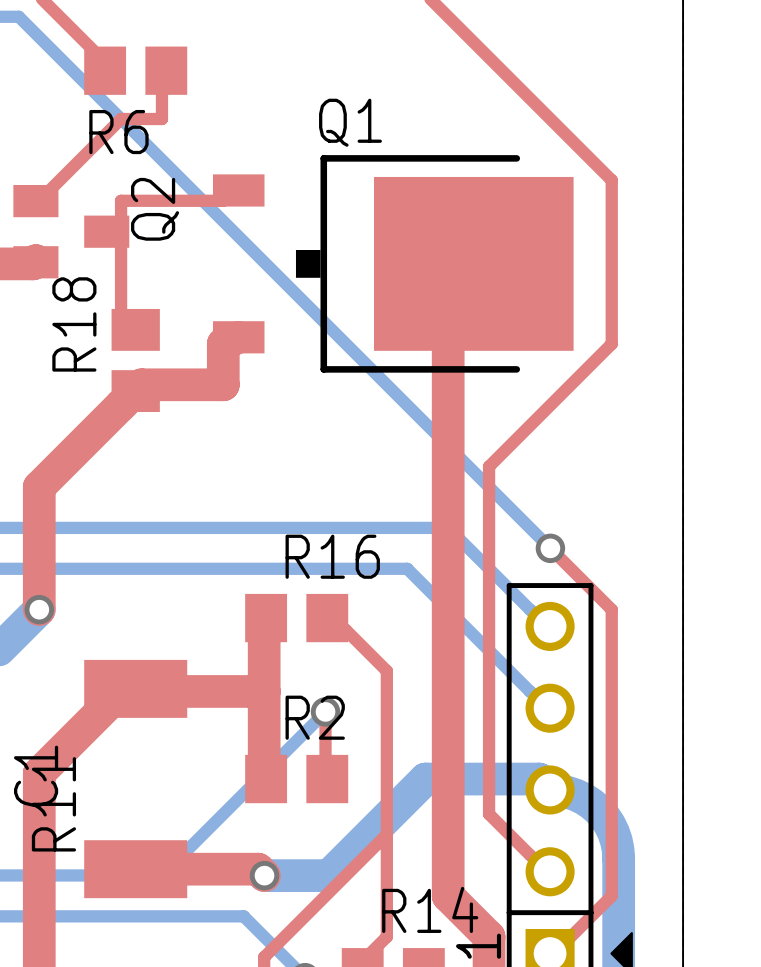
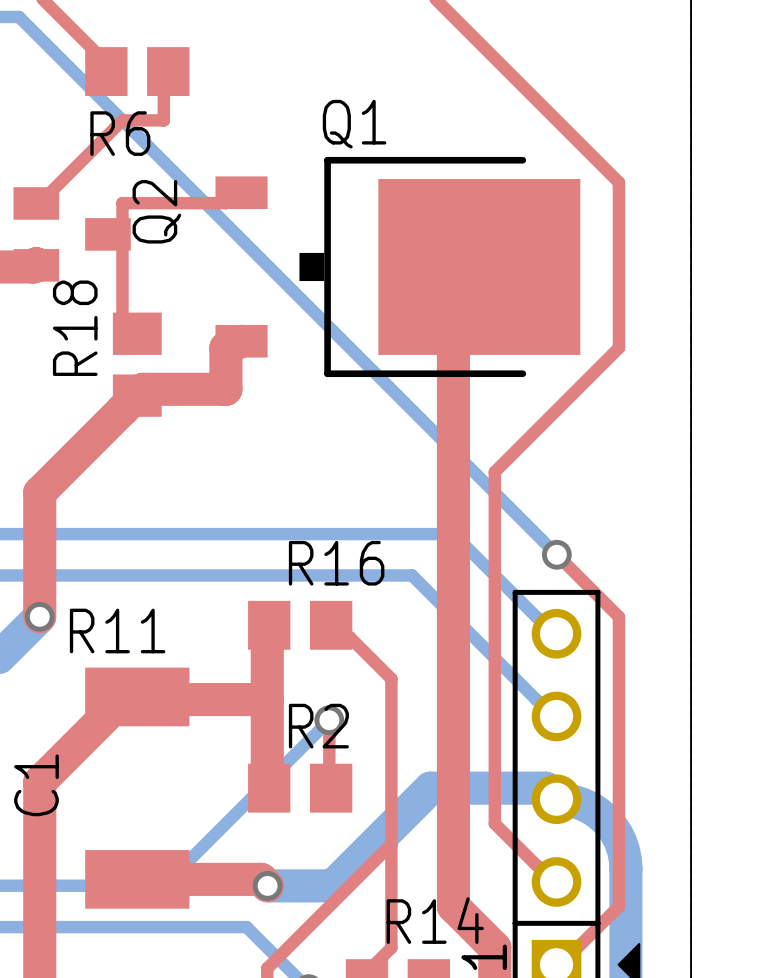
R11 name rotation: 0° (53, 804) -> 90° clockwise (117, 630)
R11 name position: R11 (53, 804) -> R11 (117, 630)

